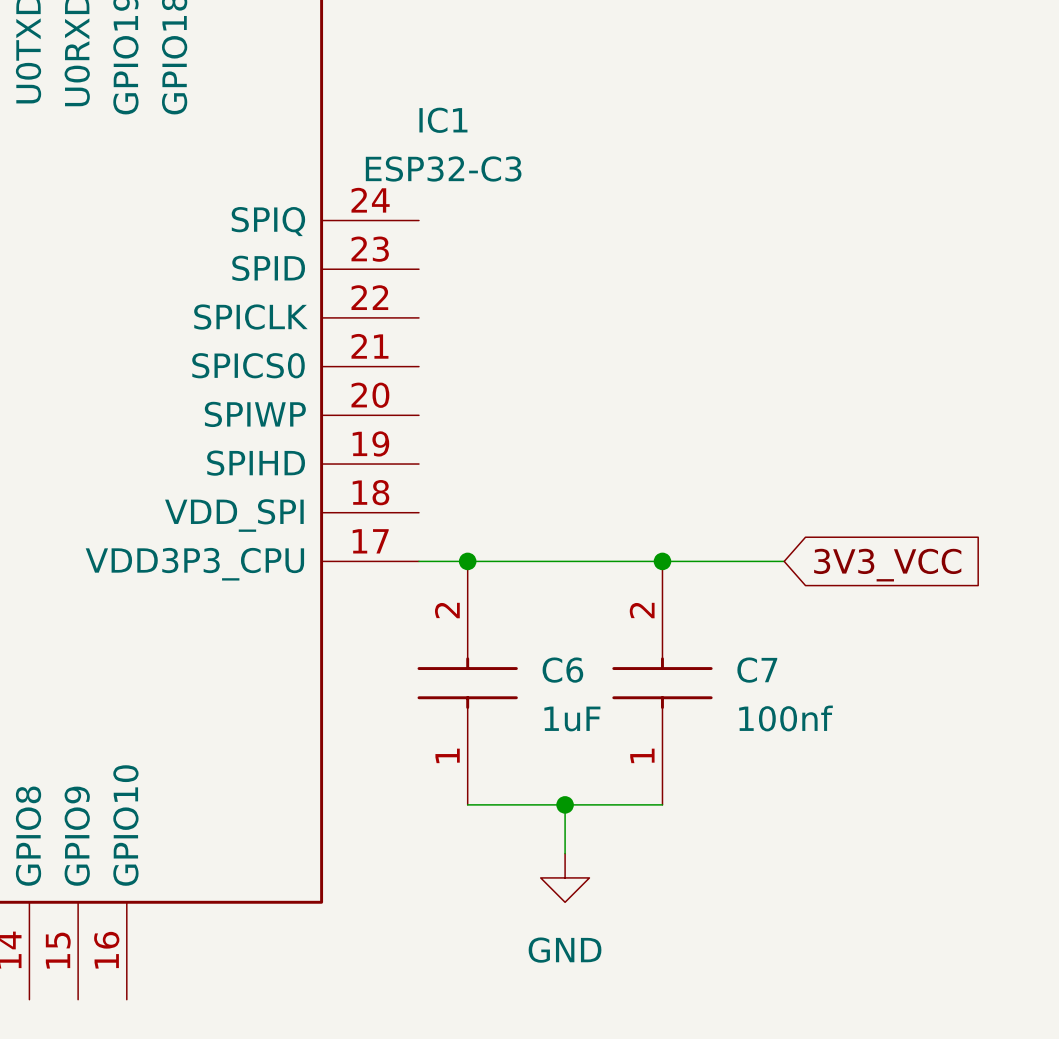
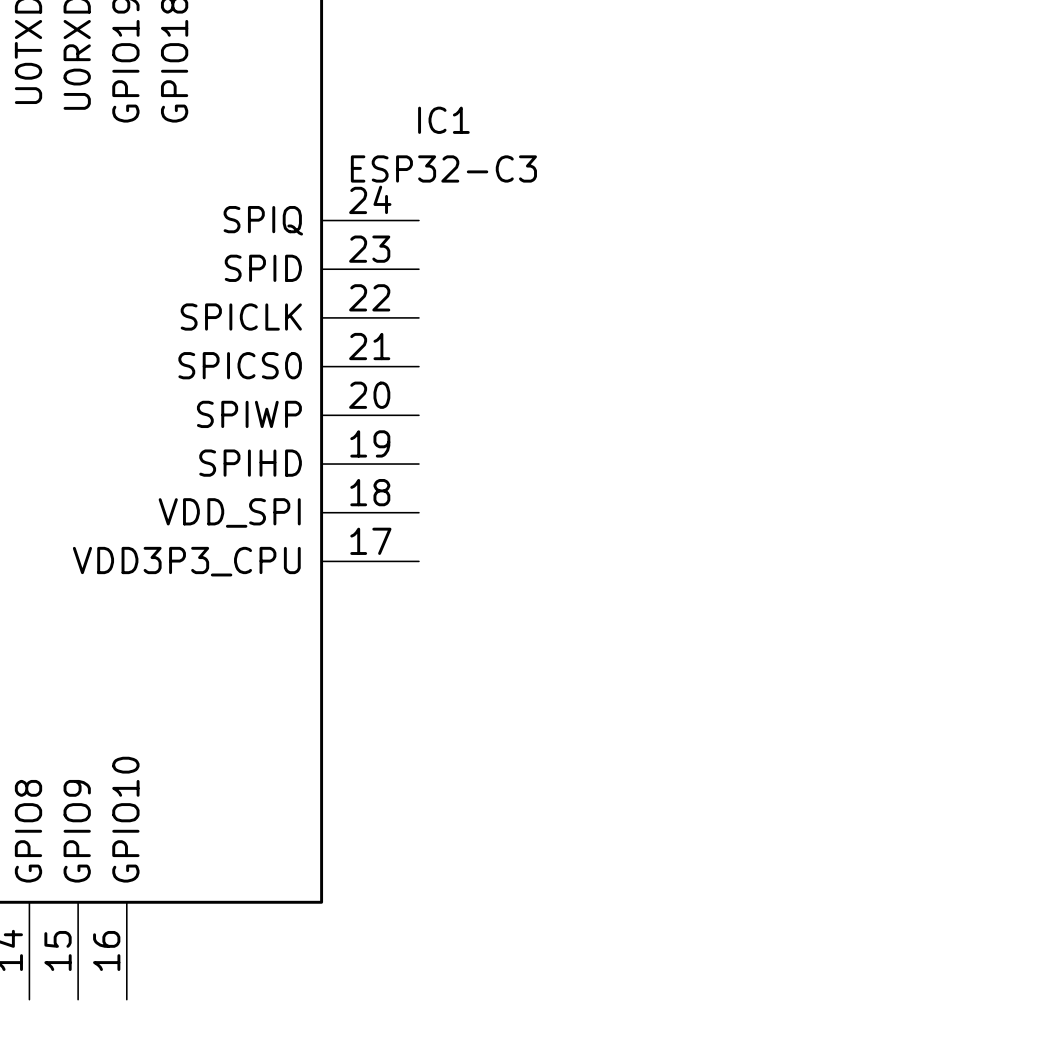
wire: (418, 561) (784, 561) -> none
junction: (467, 561) -> none
junction: (662, 561) -> none
global label: 3V3_VCC (887, 565) -> none
C6: 1uF (467, 683) -> none
C7: 100nf (662, 683) -> none
wire: (467, 804) (662, 804) -> none
wire: (565, 804) (565, 853) -> none
junction: (565, 804) -> none
power symbol: GND (565, 877) -> none

